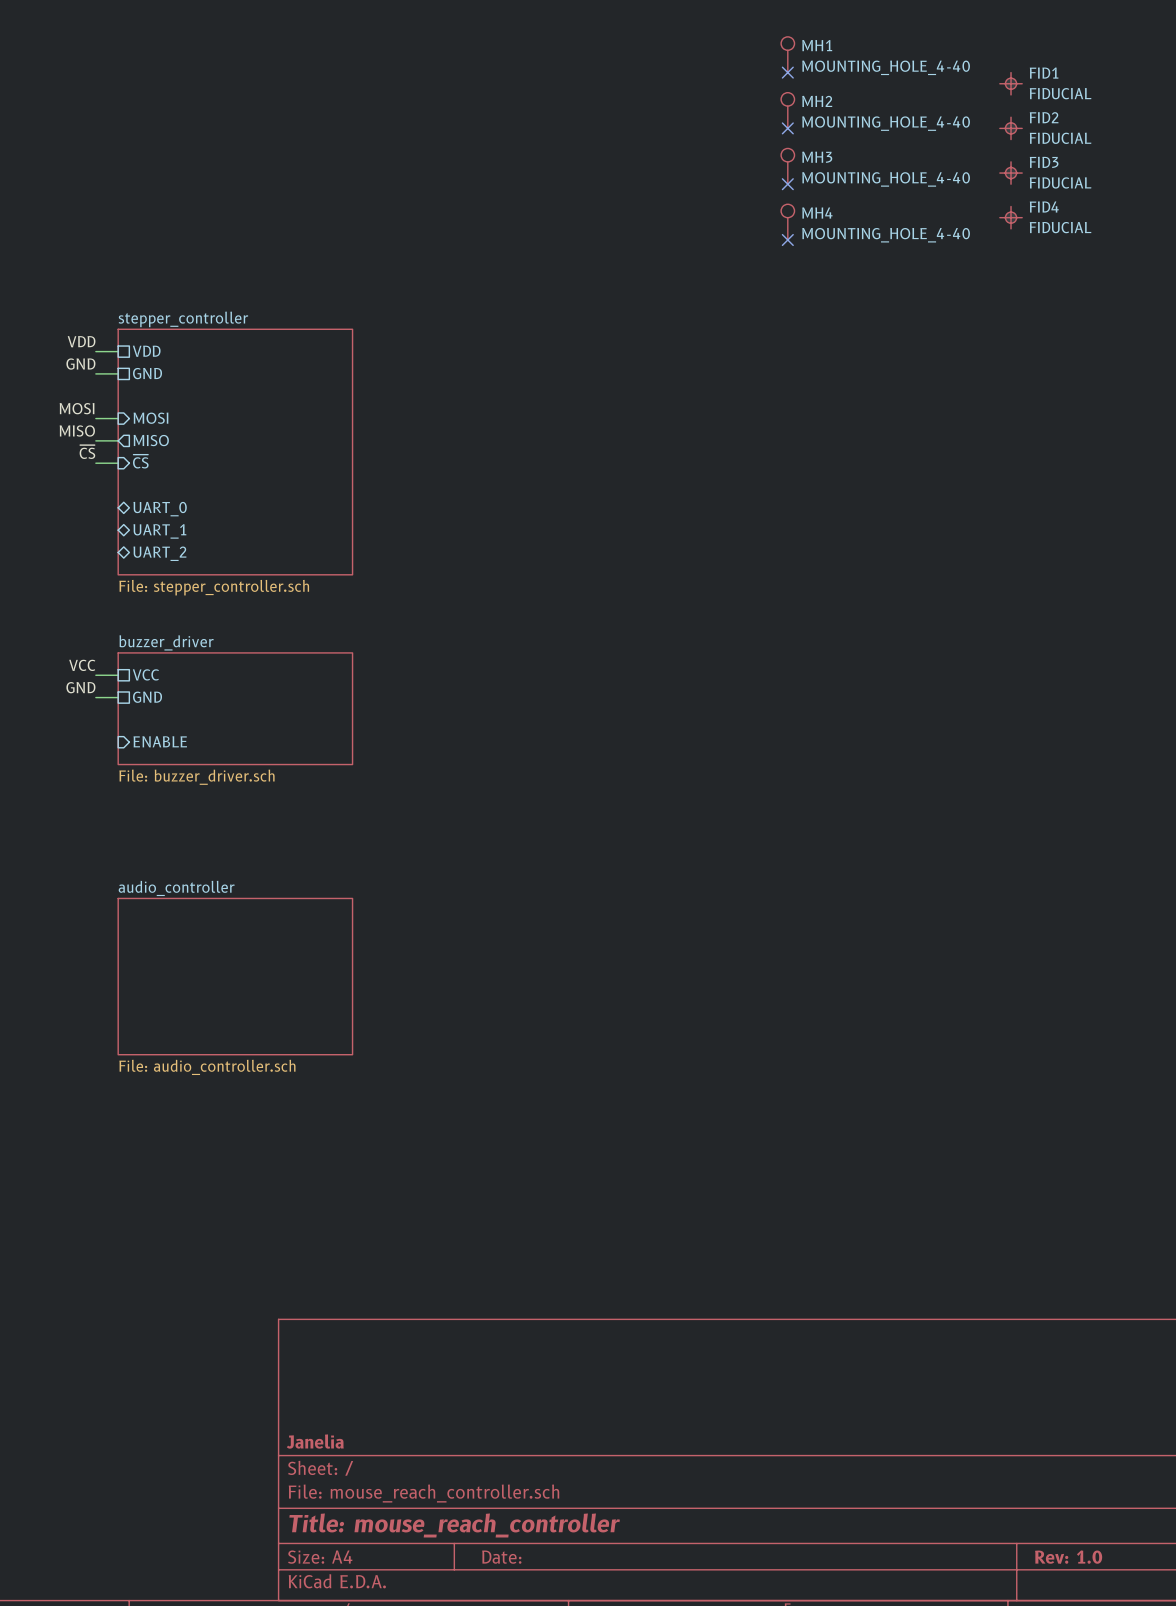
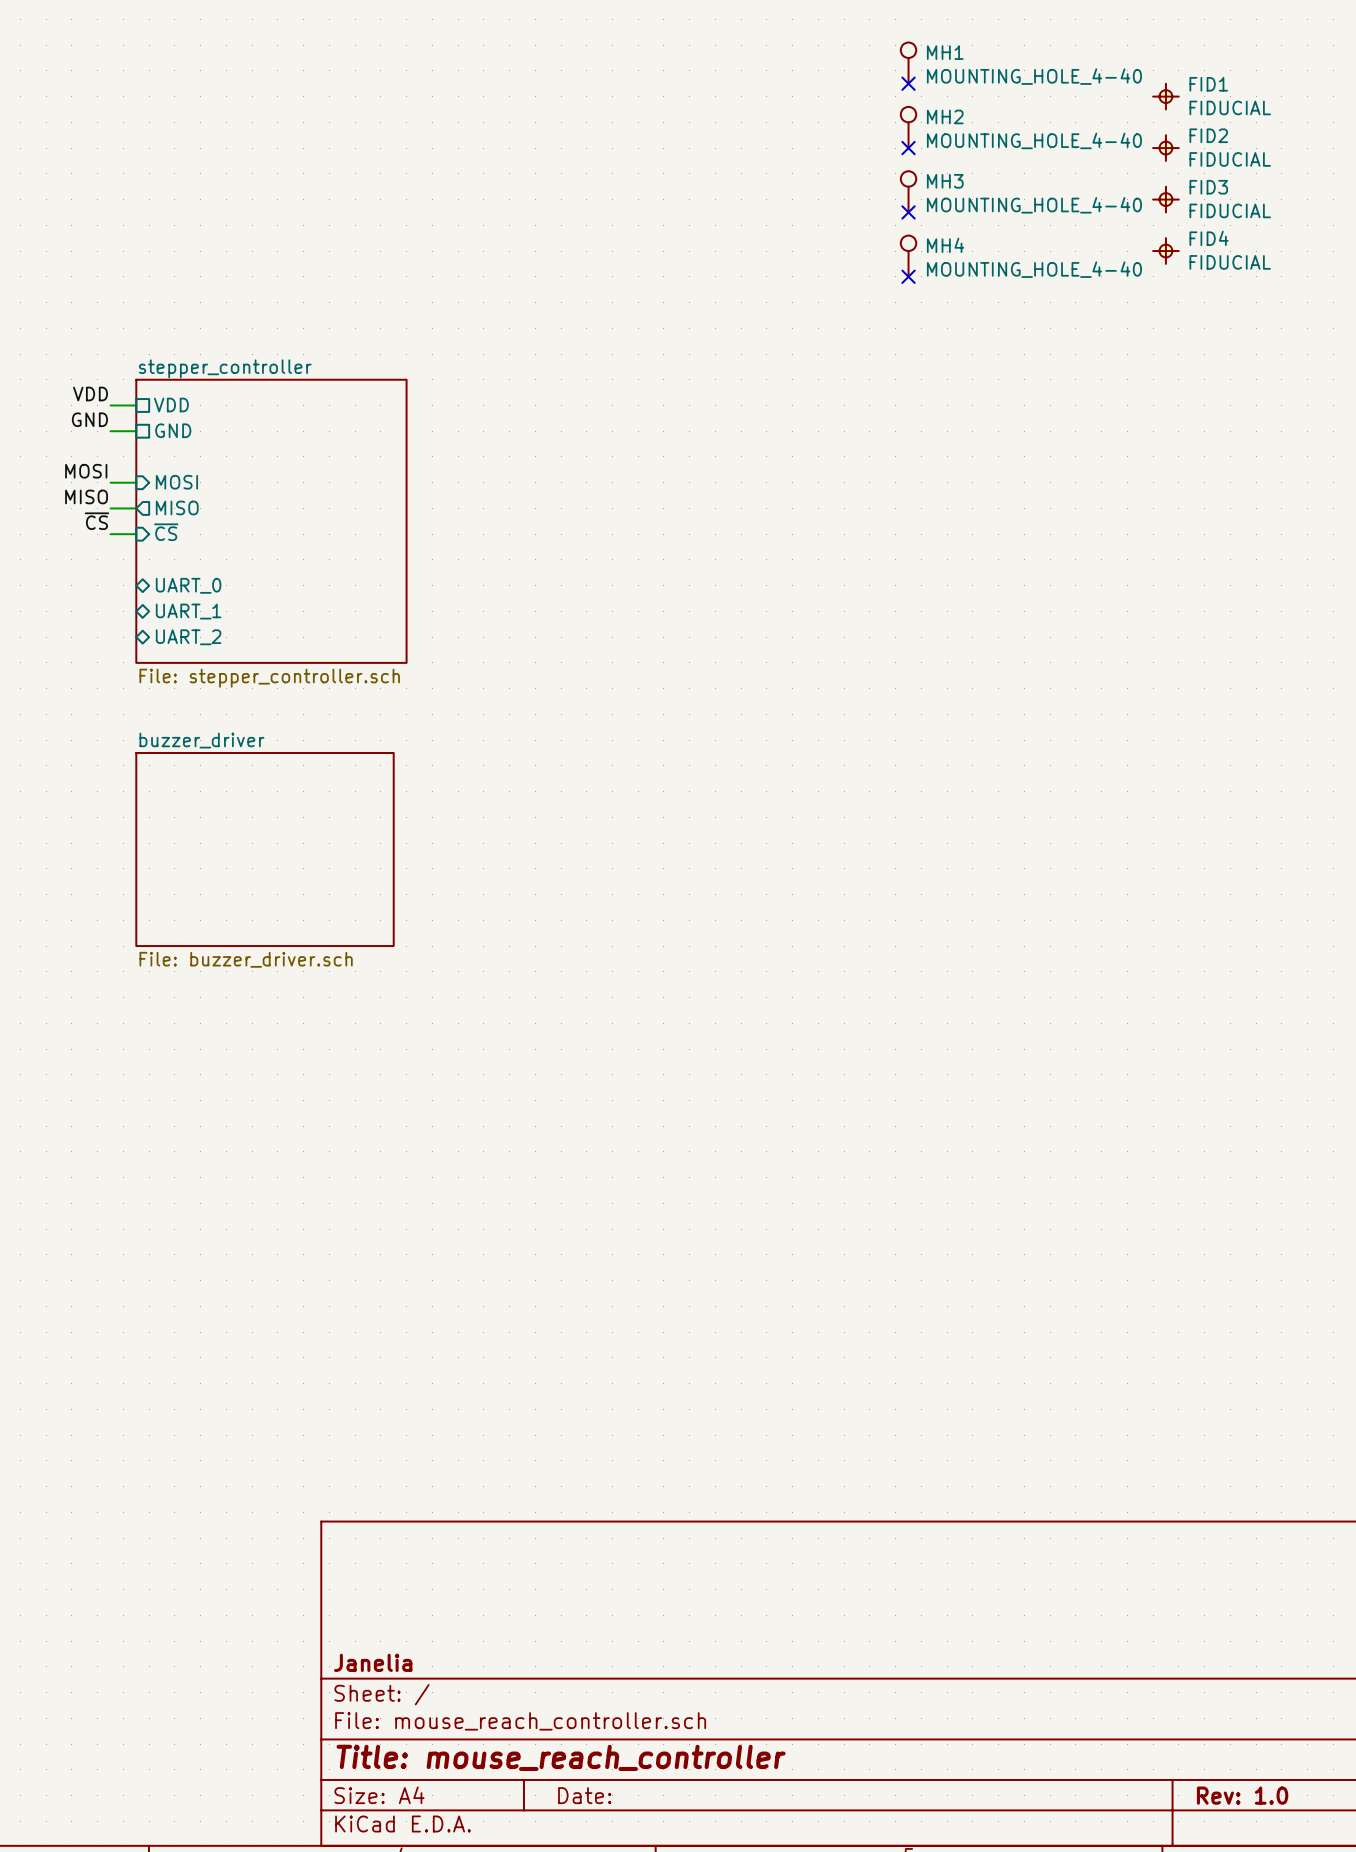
label: VCC (82, 665) -> none
sheet pin: VCC (145, 674) -> none
wire: (95, 675) (118, 675) -> none
label: GND (80, 687) -> none
wire: (95, 697) (118, 697) -> none
sheet pin: GND (147, 697) -> none
sheet buzzer_driver: File: buzzer_driver.sch (235, 708) -> none
sheet buzzer_driver: none -> File: buzzer_driver.sch (265, 849)
sheet pin: ENABLE (160, 741) -> none
sheet audio_controller: File: audio_controller.sch (235, 976) -> none

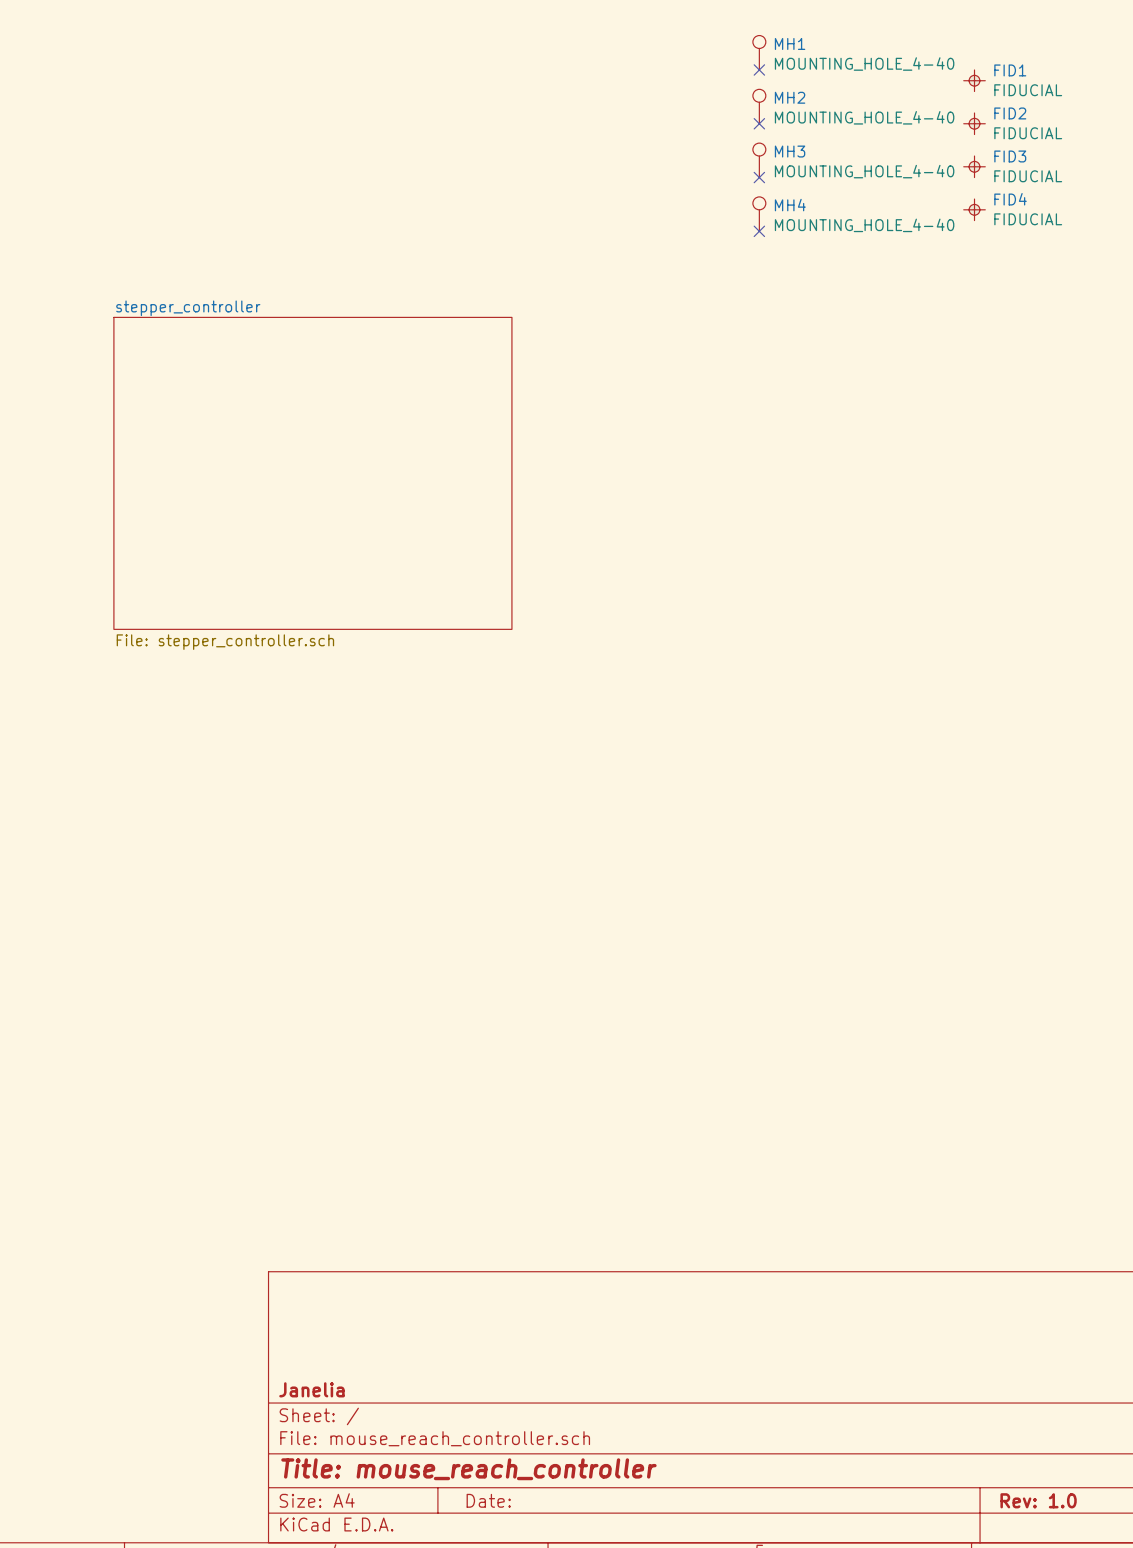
label: VDD (90, 394) -> none
wire: (110, 405) (136, 405) -> none
sheet pin: VDD (171, 405) -> none
label: GND (89, 419) -> none
sheet pin: GND (173, 430) -> none
wire: (110, 431) (136, 431) -> none
label: MOSI (86, 471) -> none
wire: (110, 482) (136, 482) -> none
sheet pin: MOSI (176, 482) -> none
label: MISO (86, 496) -> none
sheet pin: MISO (177, 507) -> none
wire: (110, 508) (136, 508) -> none
label: ~{CS} (96, 521) -> none
sheet stepper_controller: File: stepper_controller.sch (271, 521) -> none
sheet pin: ~{CS} (166, 532) -> none
wire: (110, 534) (136, 534) -> none
sheet stepper_controller: none -> File: stepper_controller.sch (312, 473)
sheet pin: UART_0 (188, 585) -> none
sheet pin: UART_1 (188, 611) -> none
sheet pin: UART_2 (188, 637) -> none
sheet buzzer_driver: File: buzzer_driver.sch (265, 849) -> none

